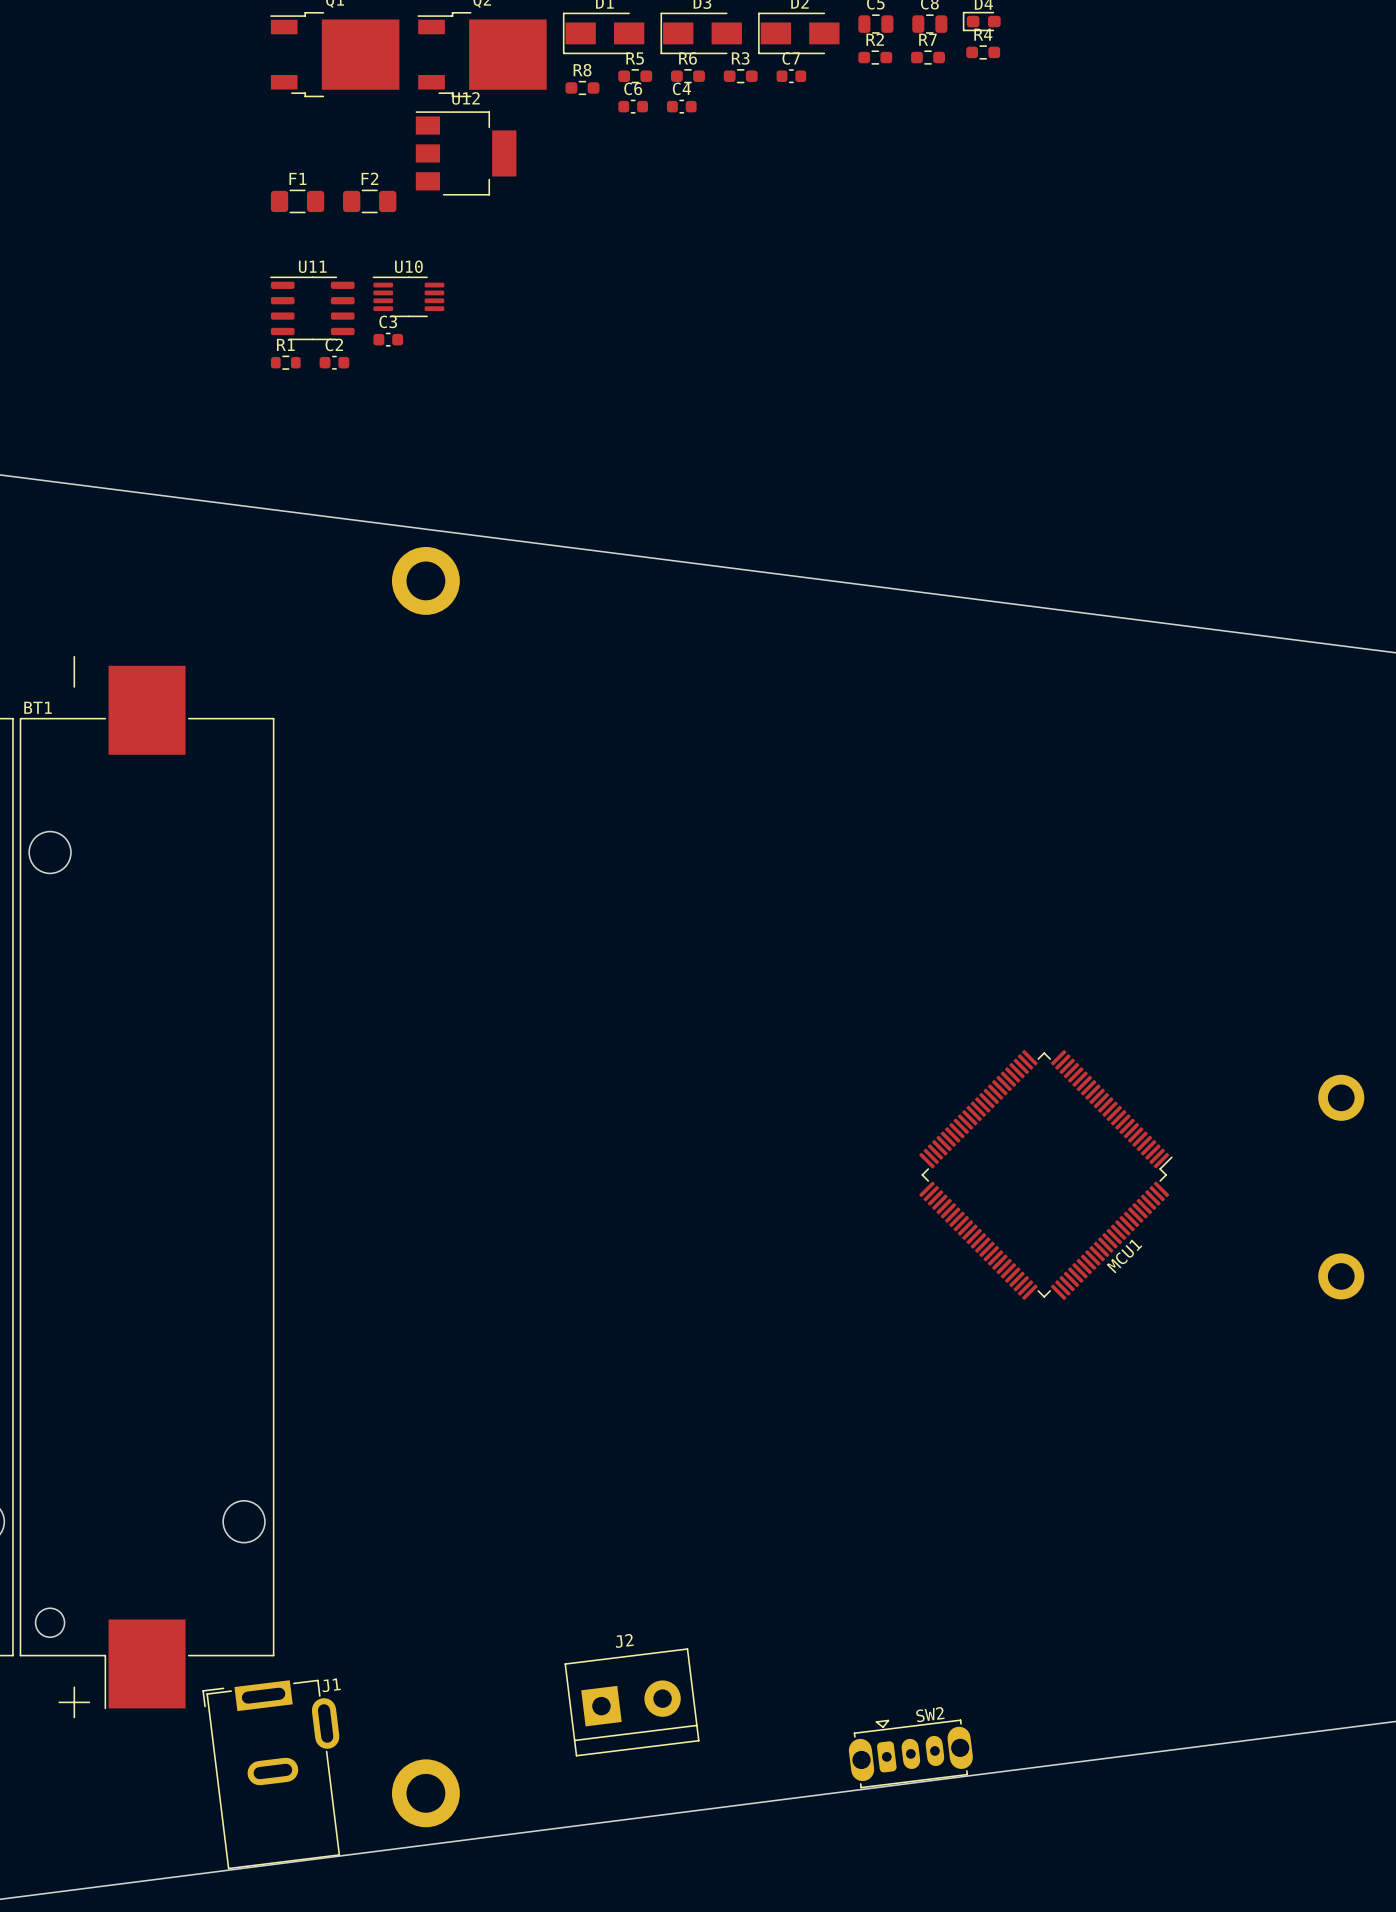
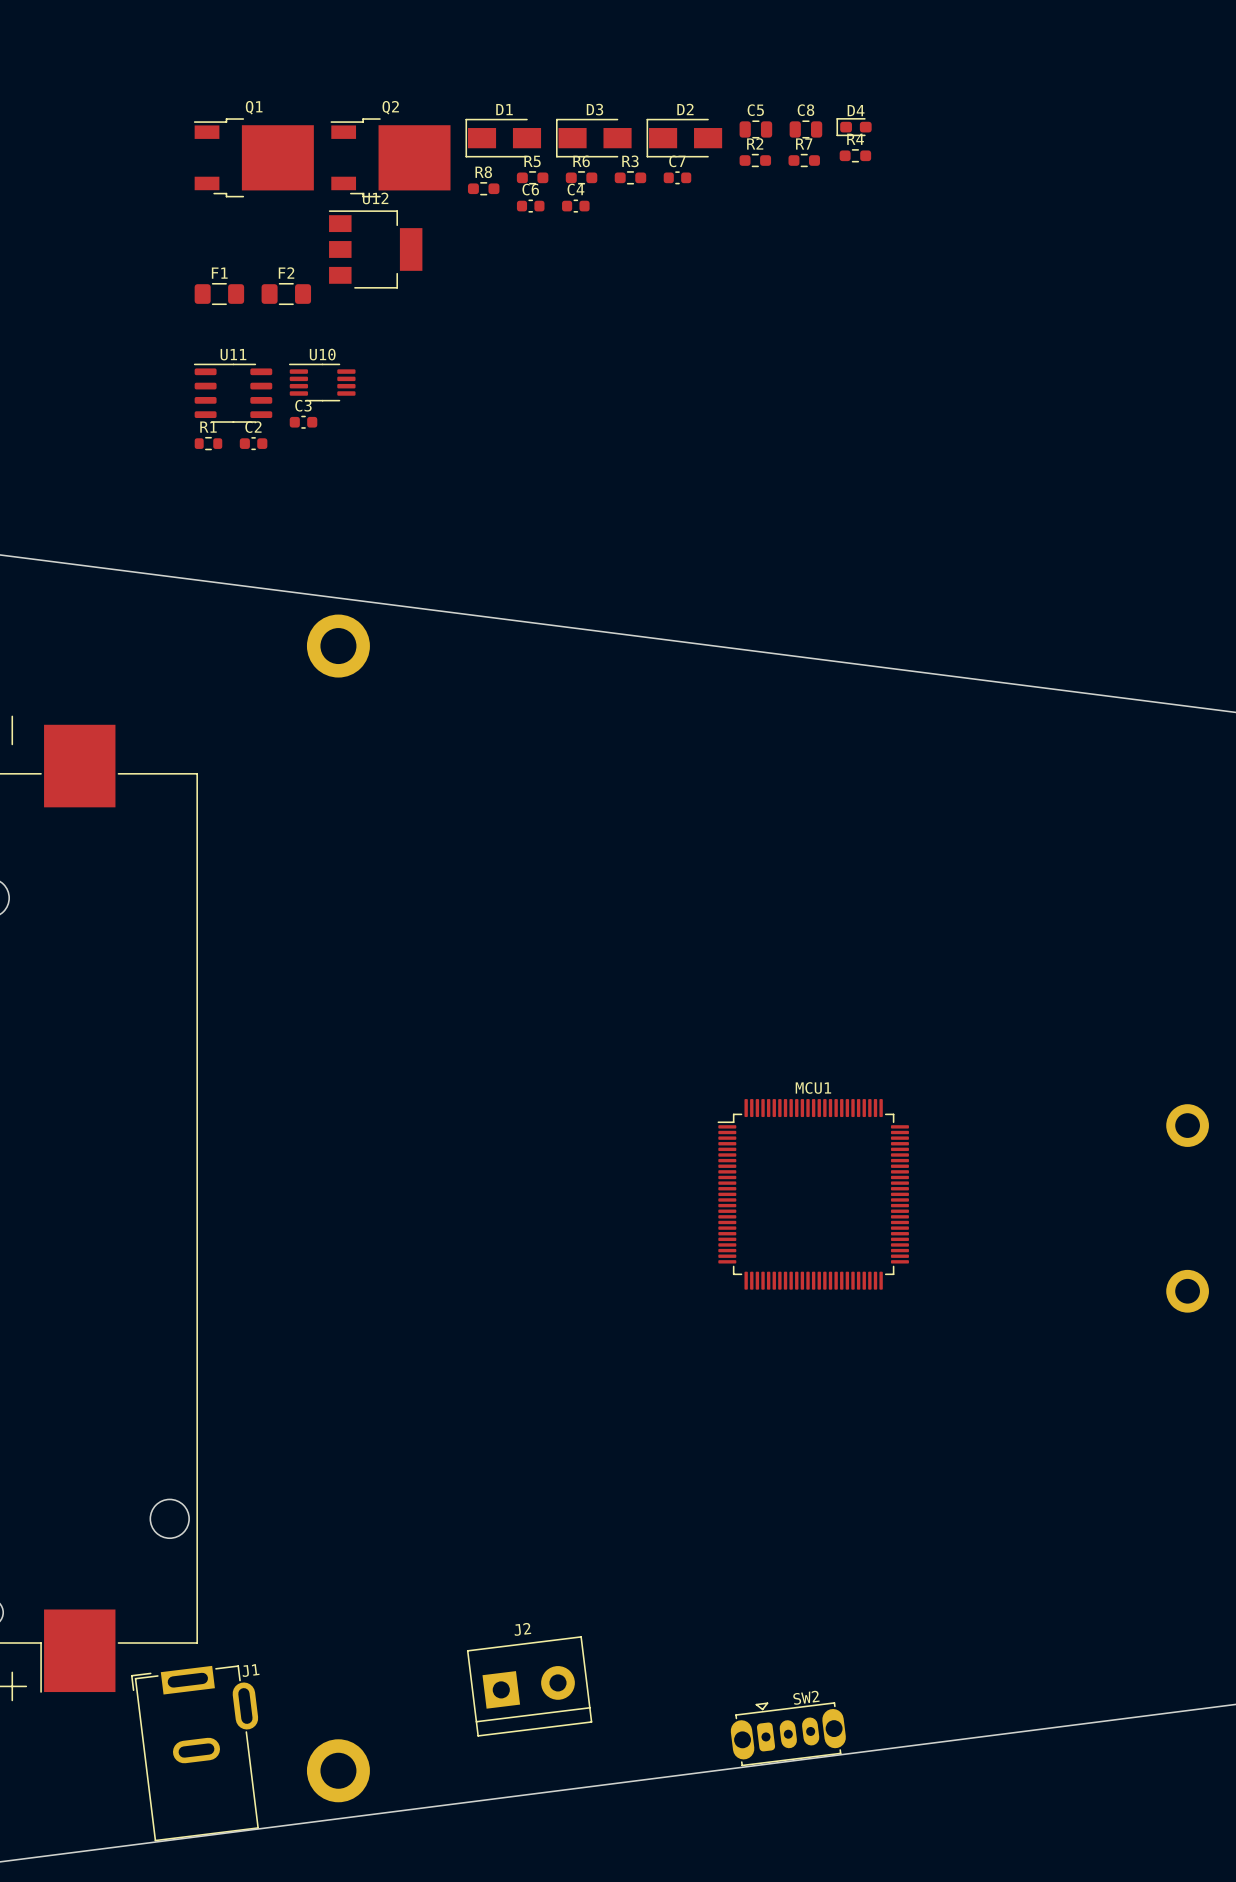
MCU1 rotation: 0° (1045, 1174) -> 135° counterclockwise (813, 1194)

